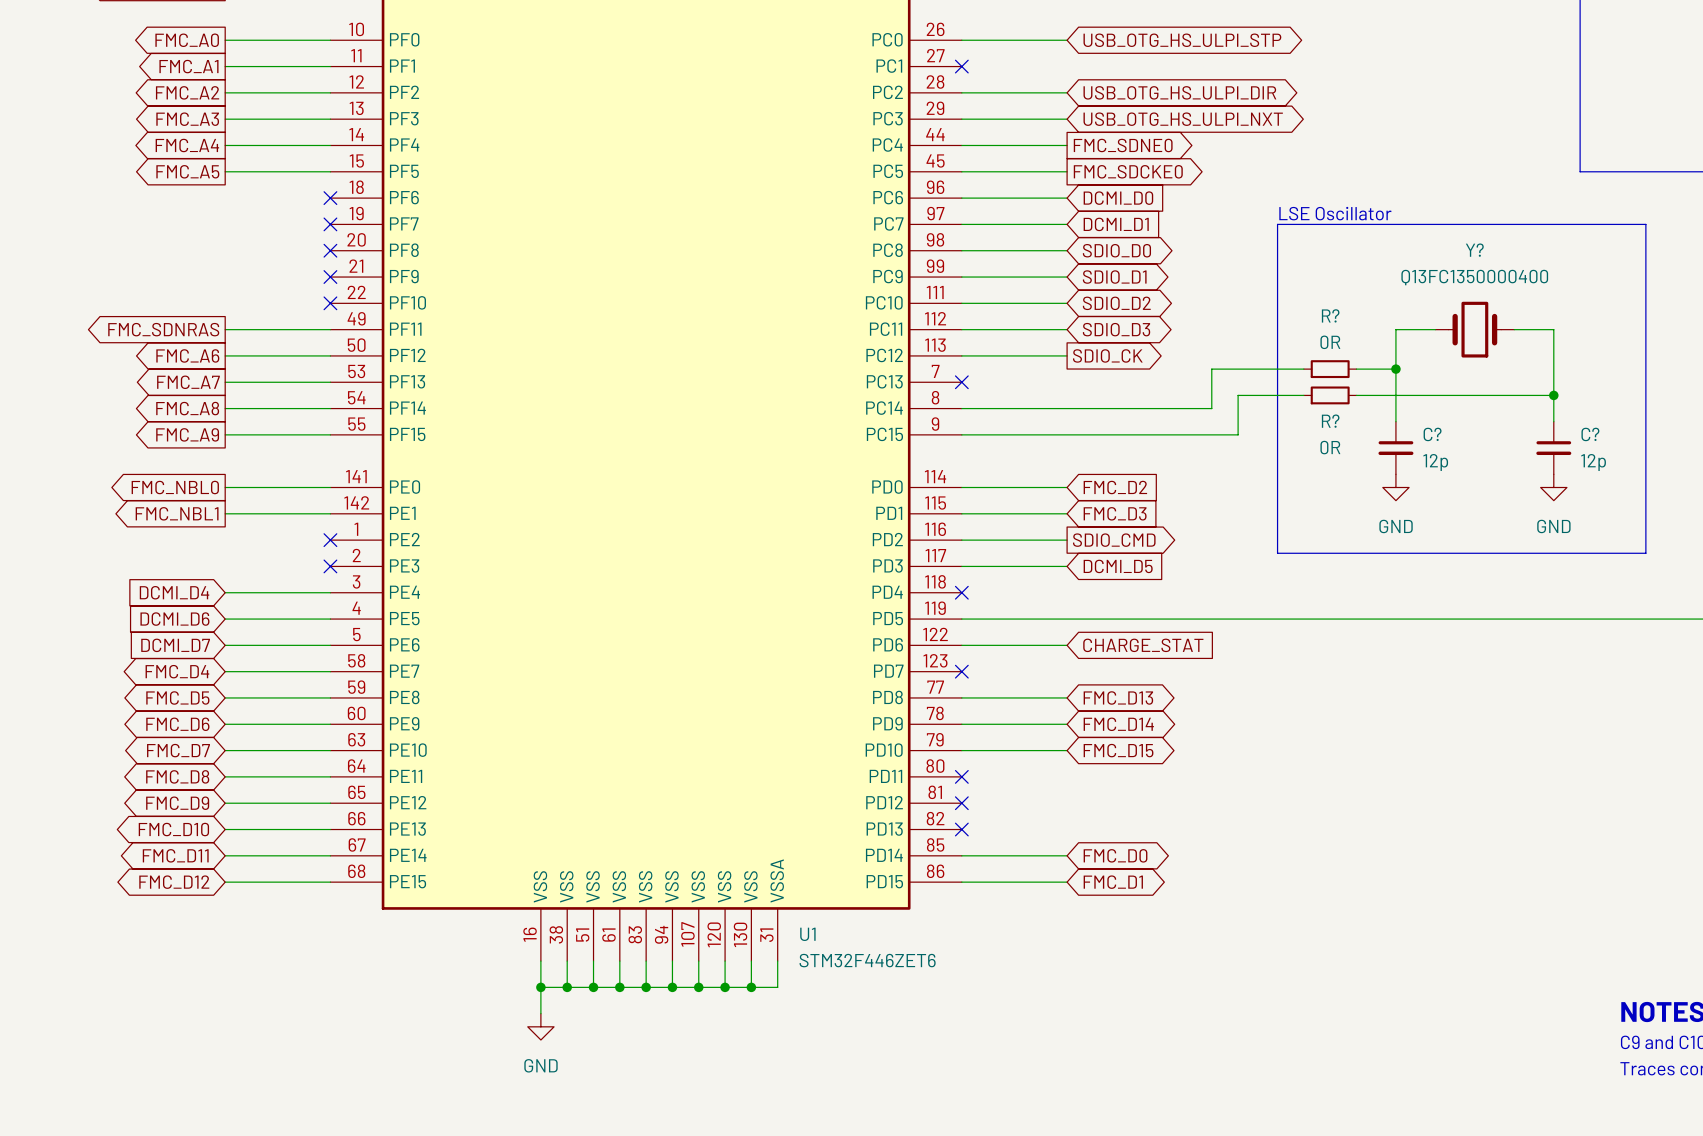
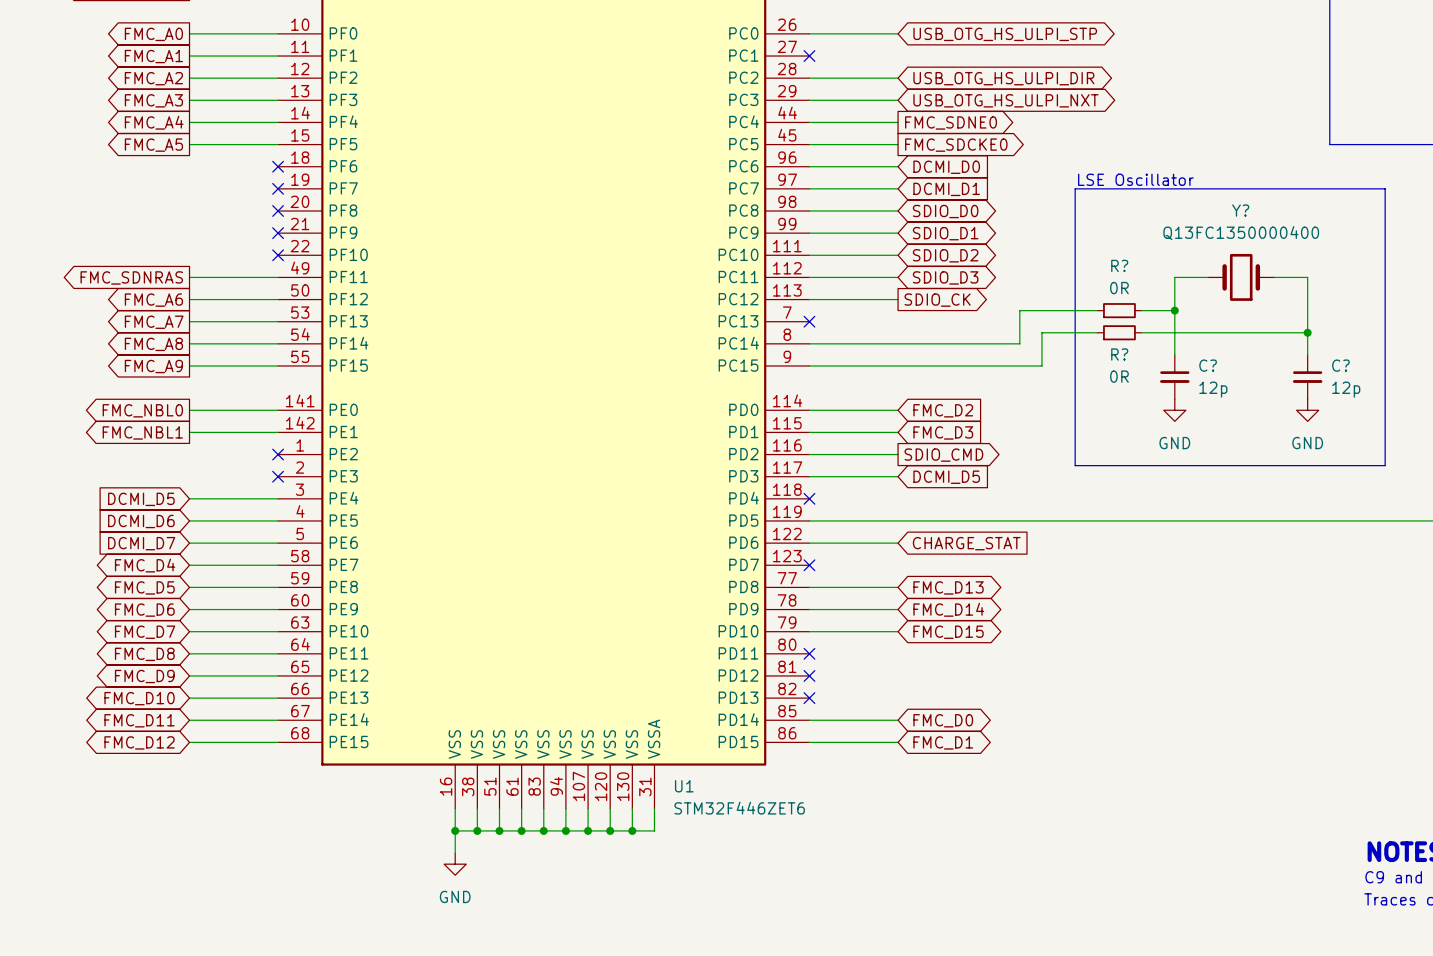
global label: DCMI_D4 (174, 592) -> DCMI_D5 (141, 499)

